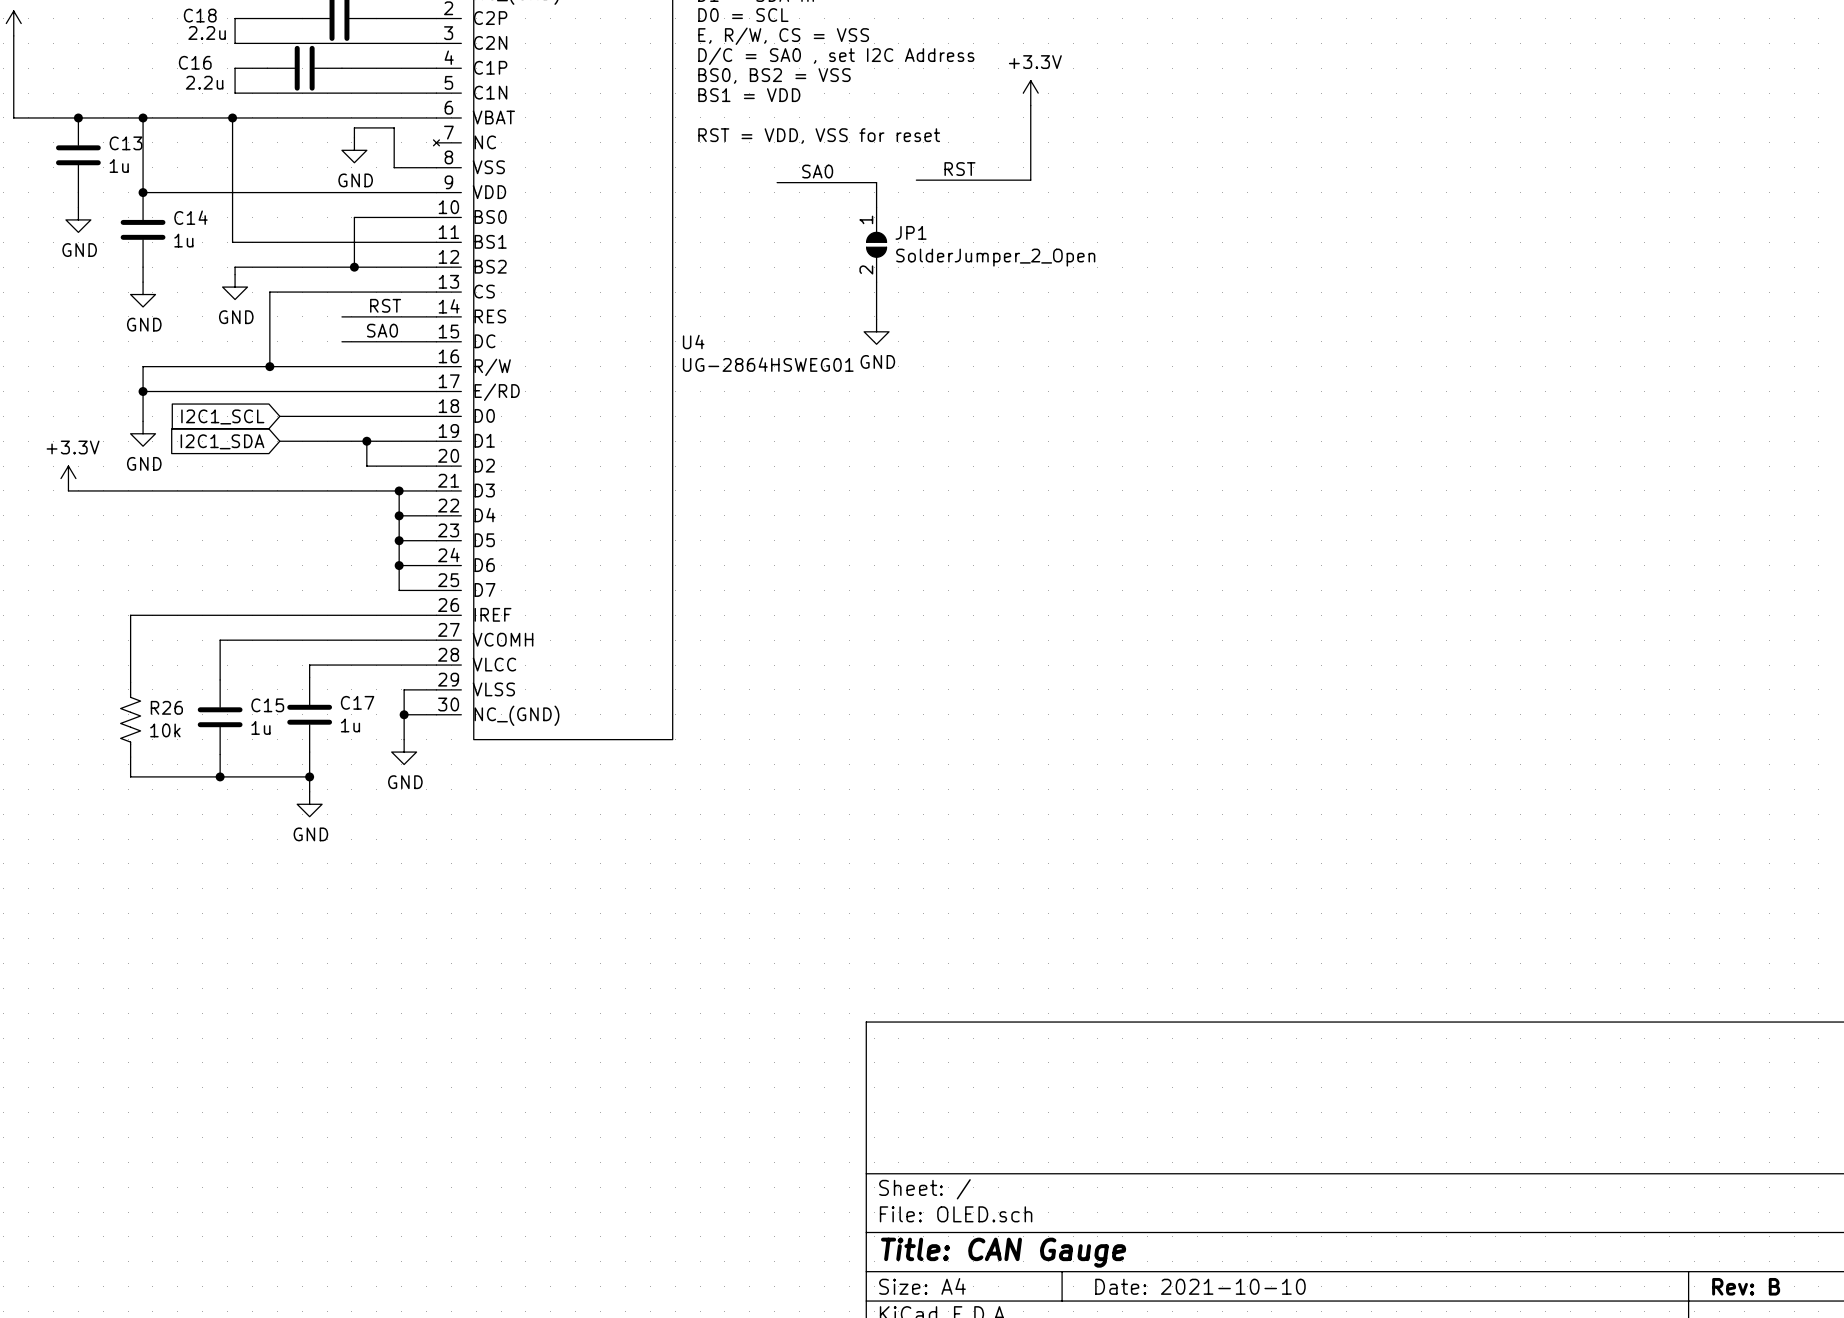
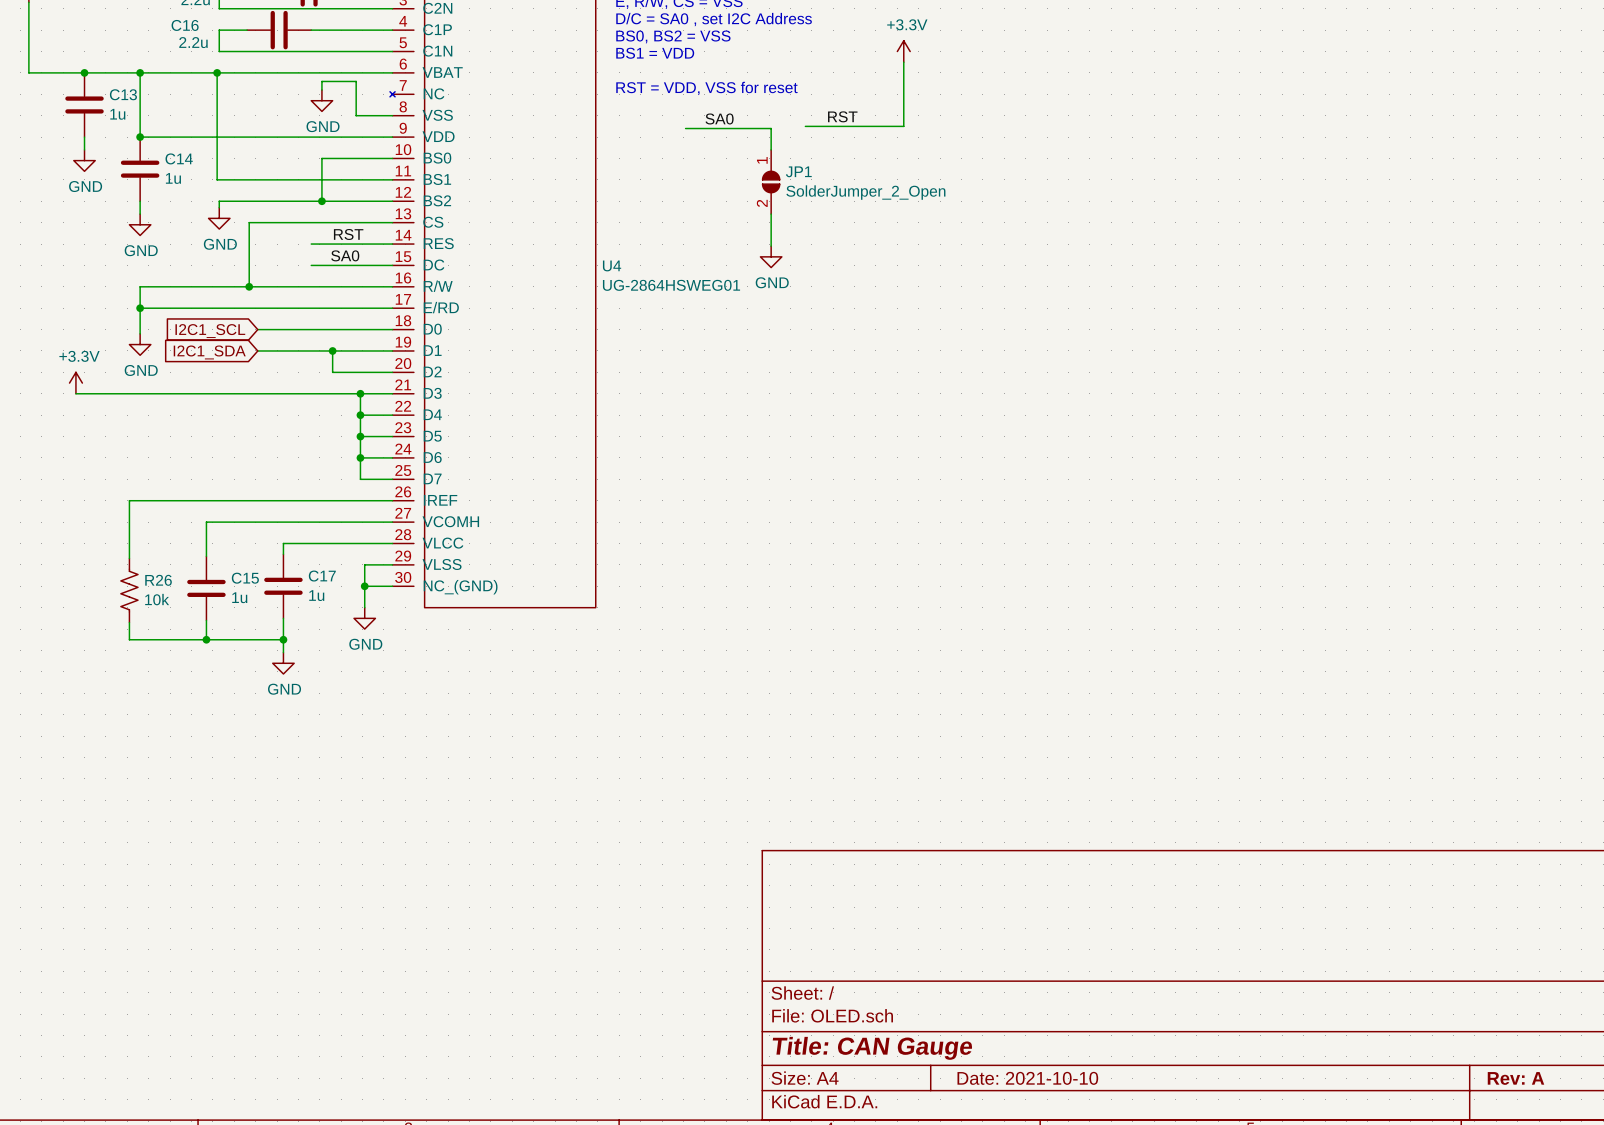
title block: Rev: B (1746, 1286) -> Rev: A (1515, 1078)

